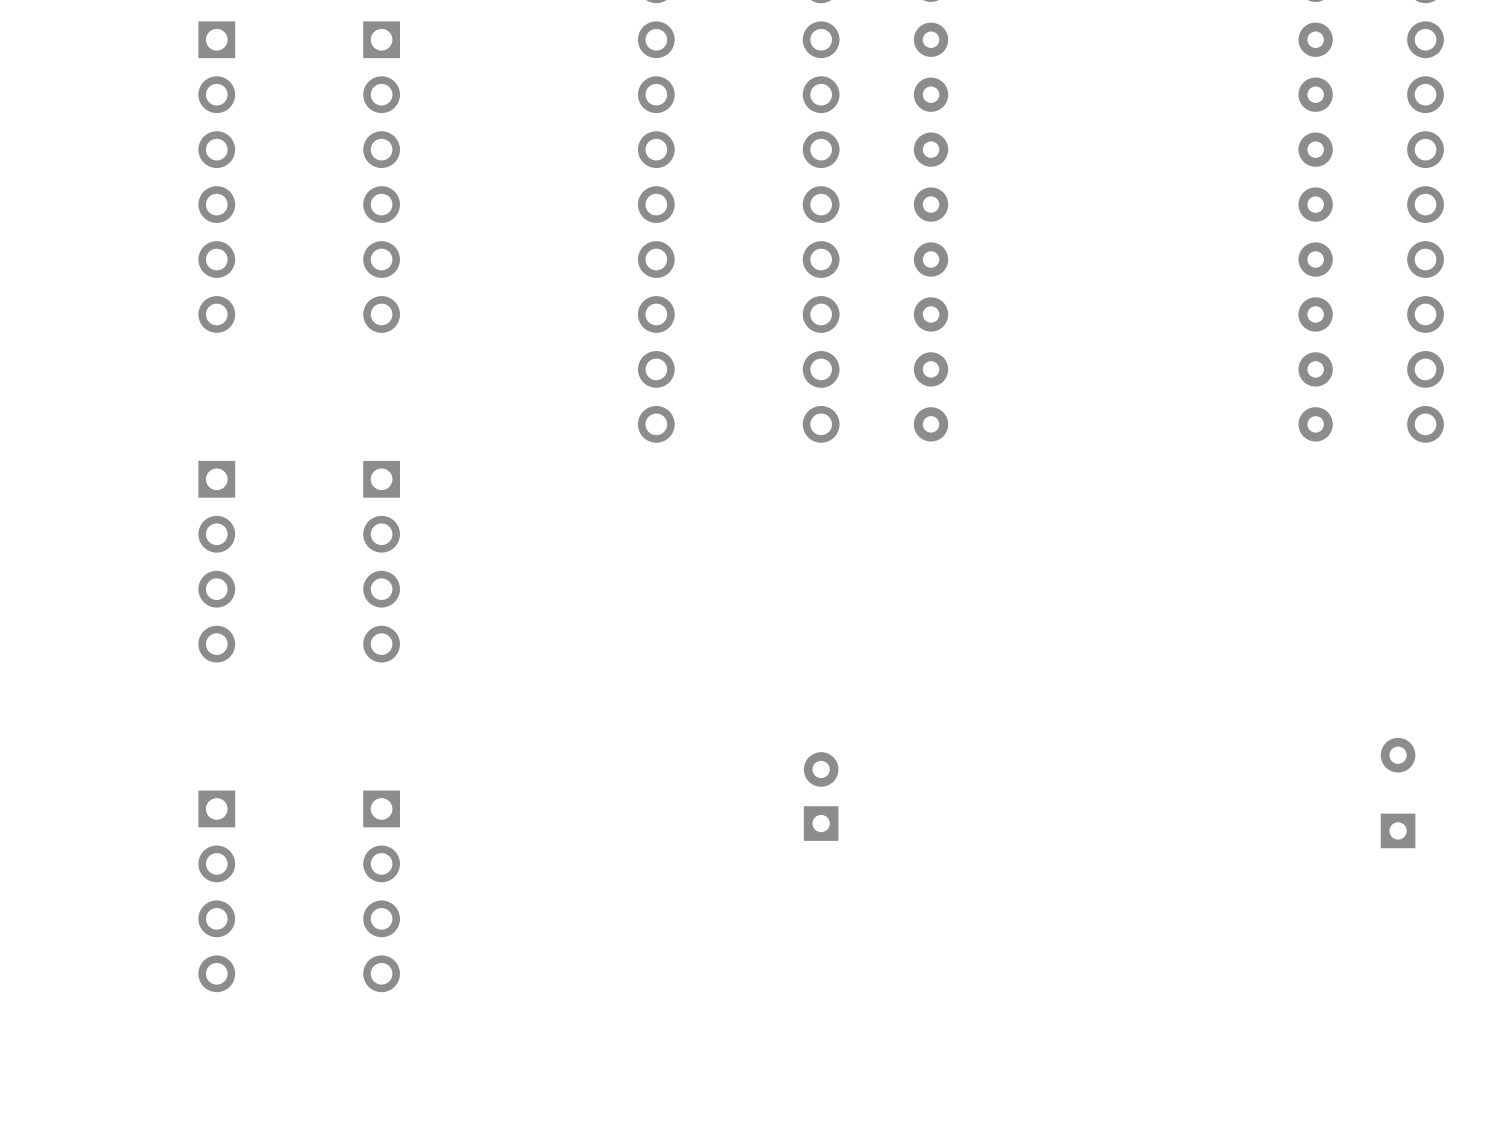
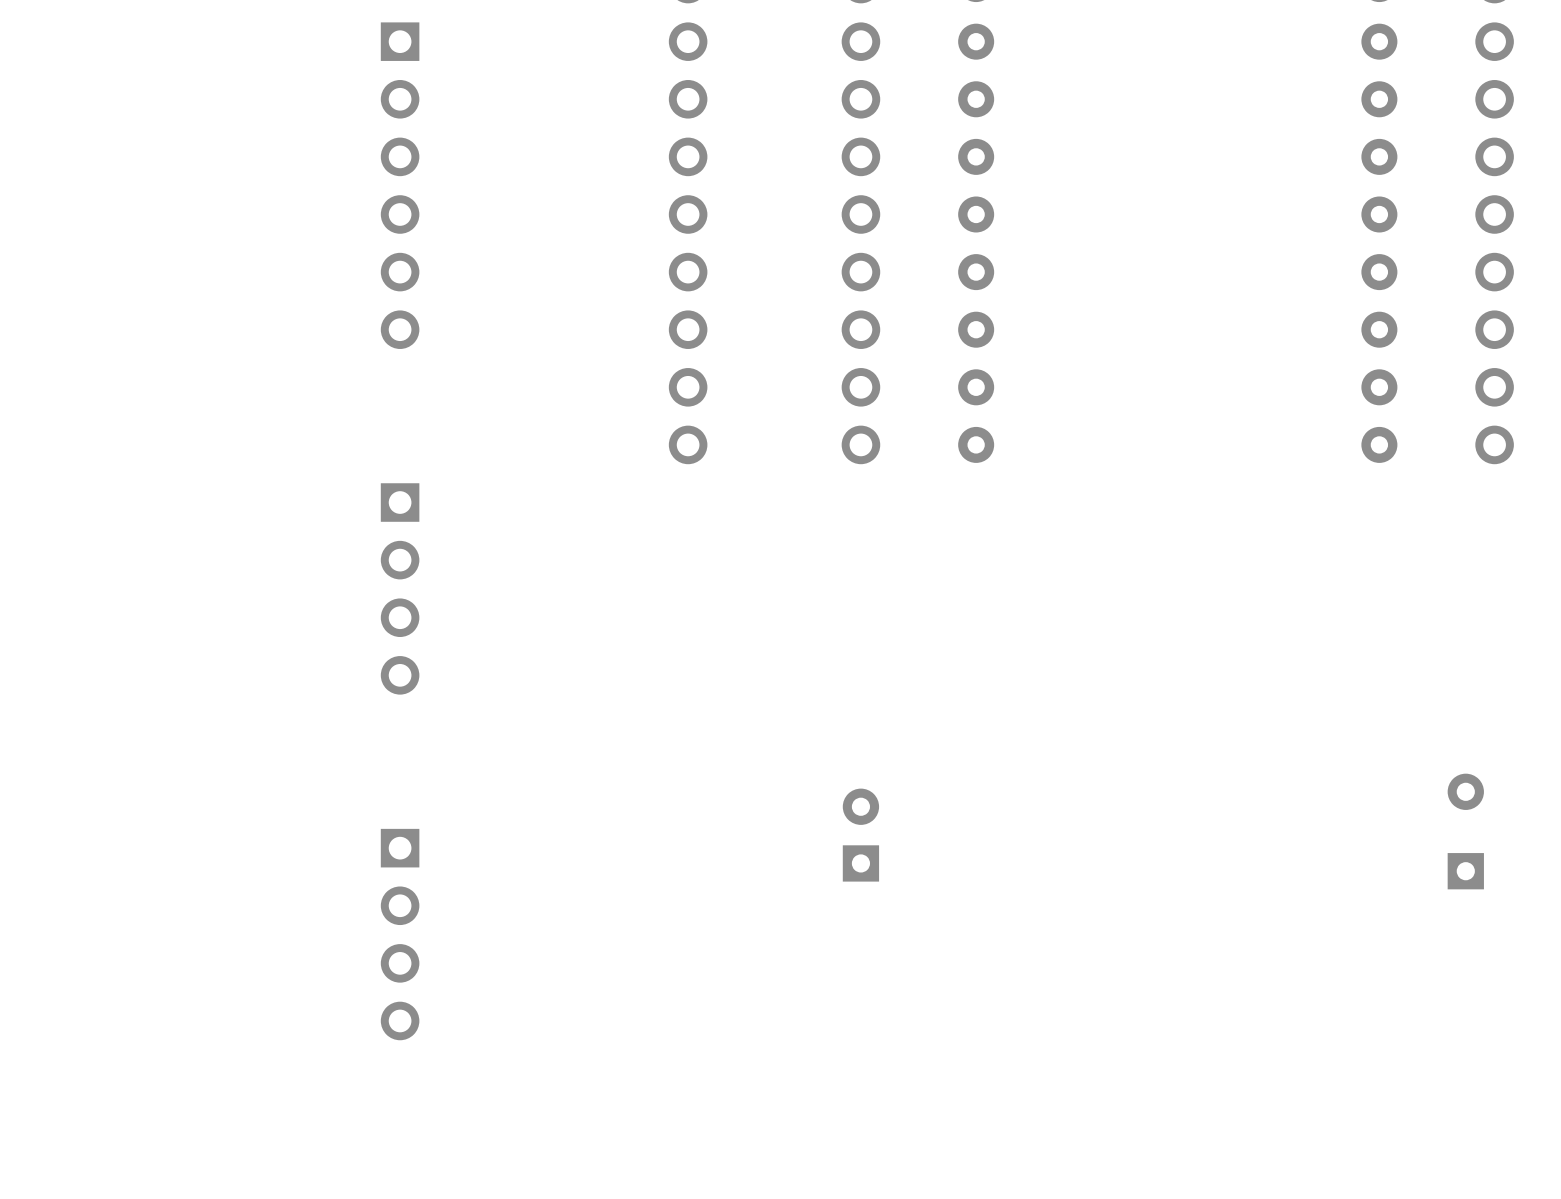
part: (216, 177) -> none
part: (216, 561) -> none
part: (216, 891) -> none

